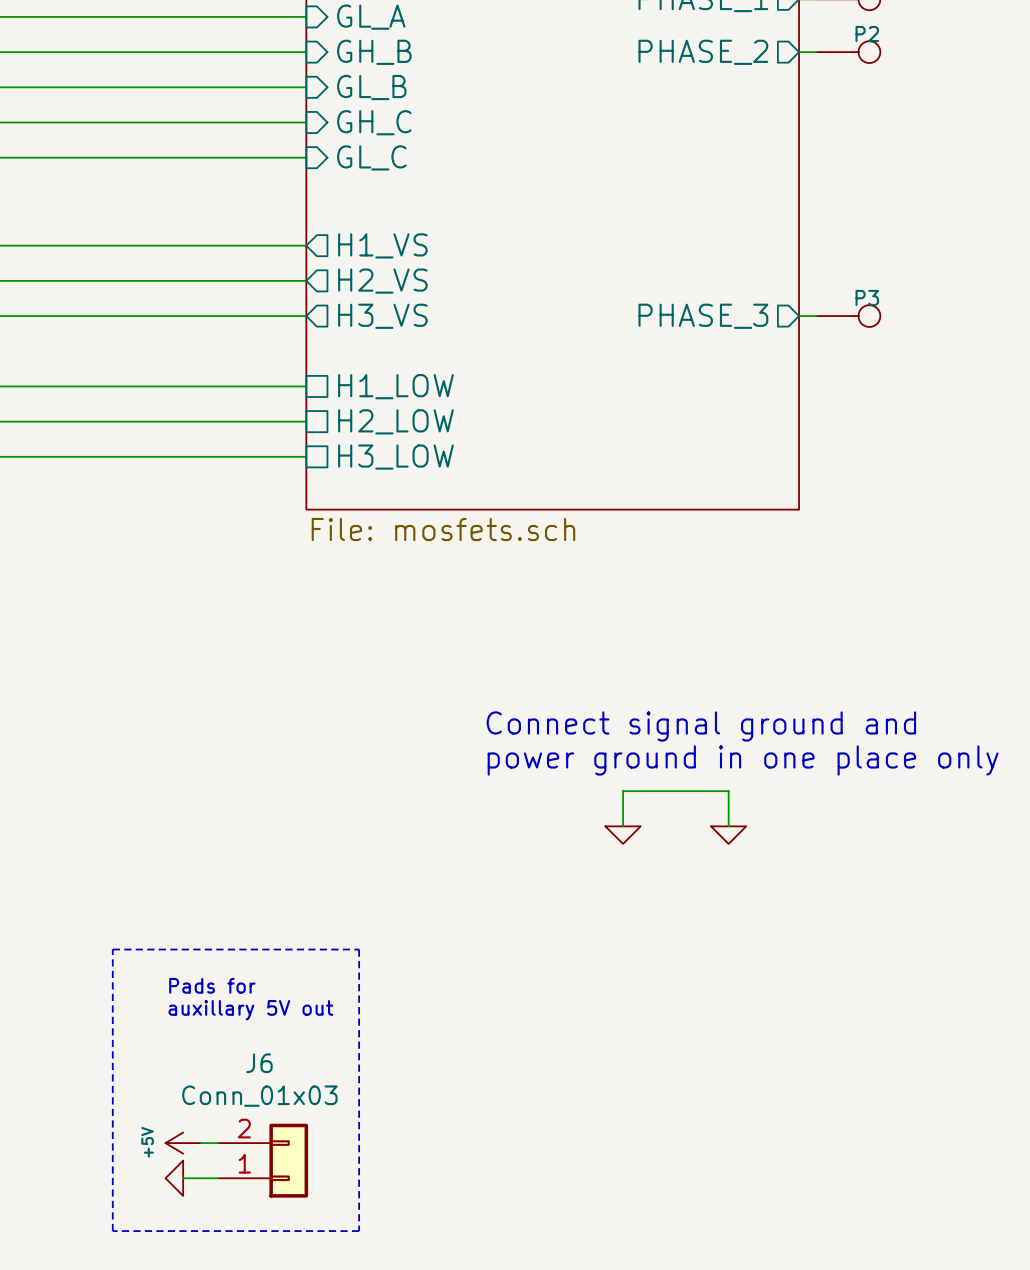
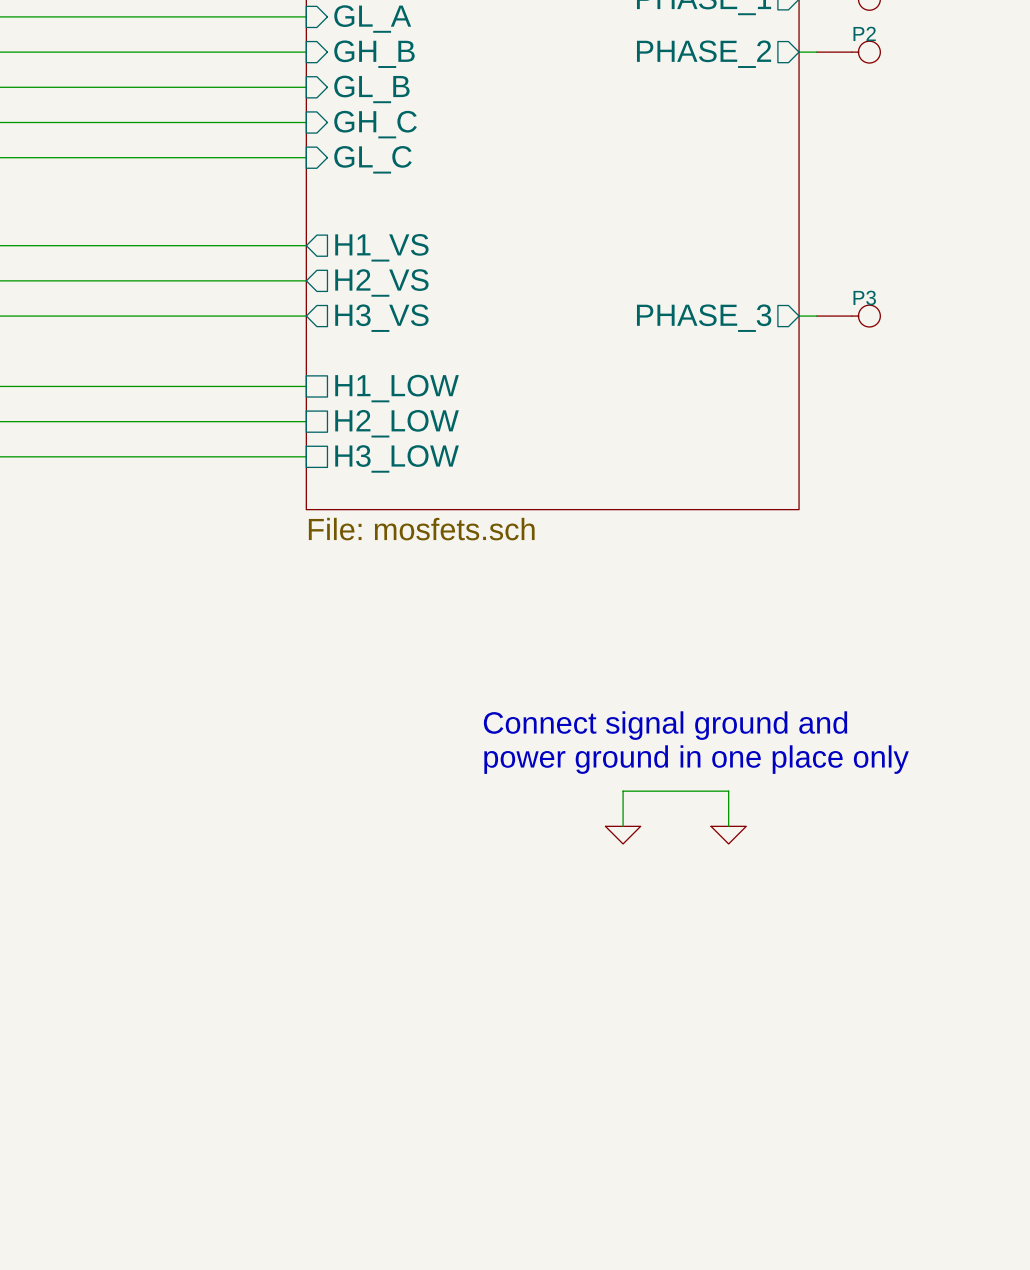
line: (112, 949) (112, 1231) (359, 1231) (359, 949) (112, 949) -> none
text: Pads for (212, 985) -> none
text: auxillary 5V out (250, 1010) -> none
power symbol: +5V (183, 1143) -> none
wire: (200, 1143) (218, 1143) -> none
J6: Conn_01x03 (263, 1160) -> none
power symbol: (174, 1178) -> none
wire: (183, 1178) (218, 1178) -> none

